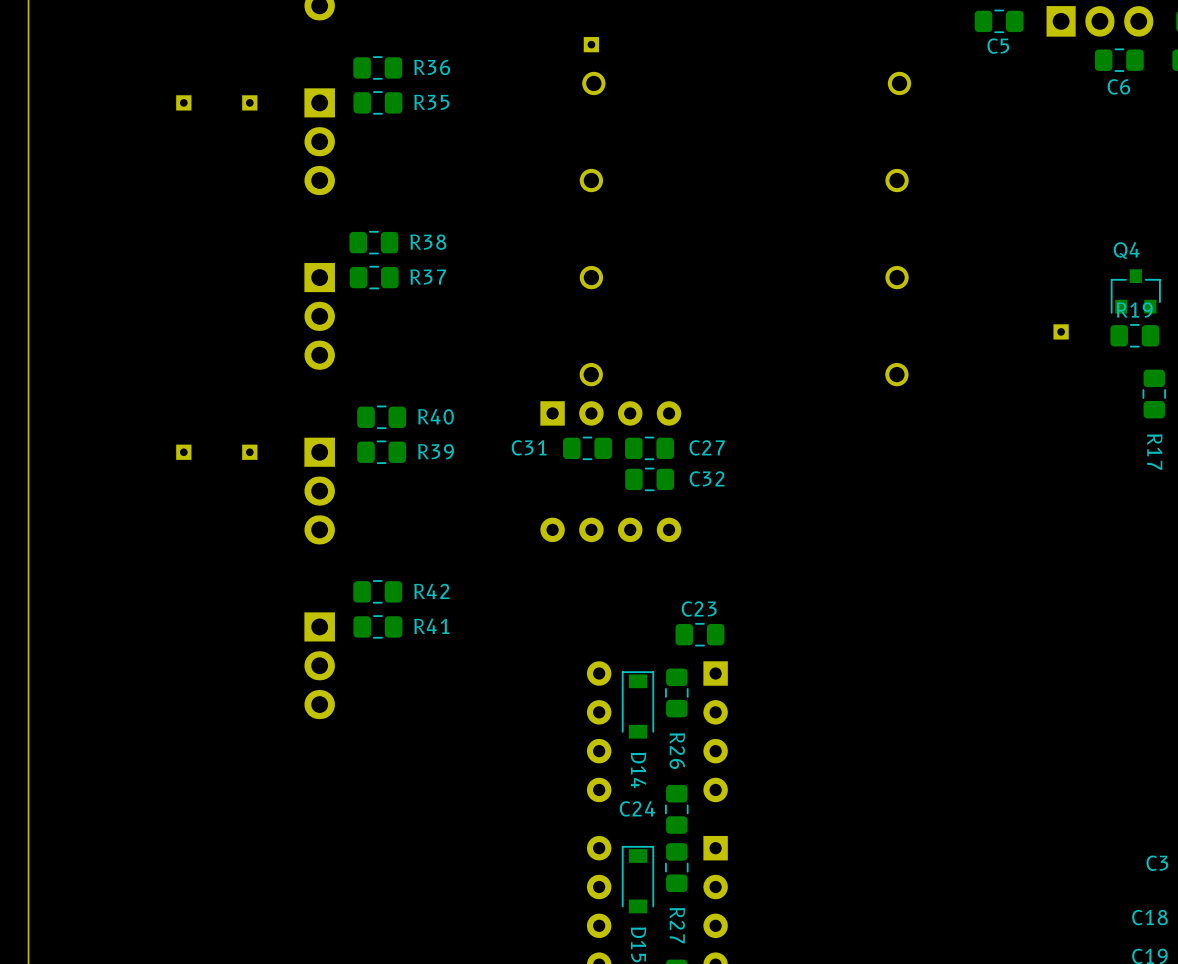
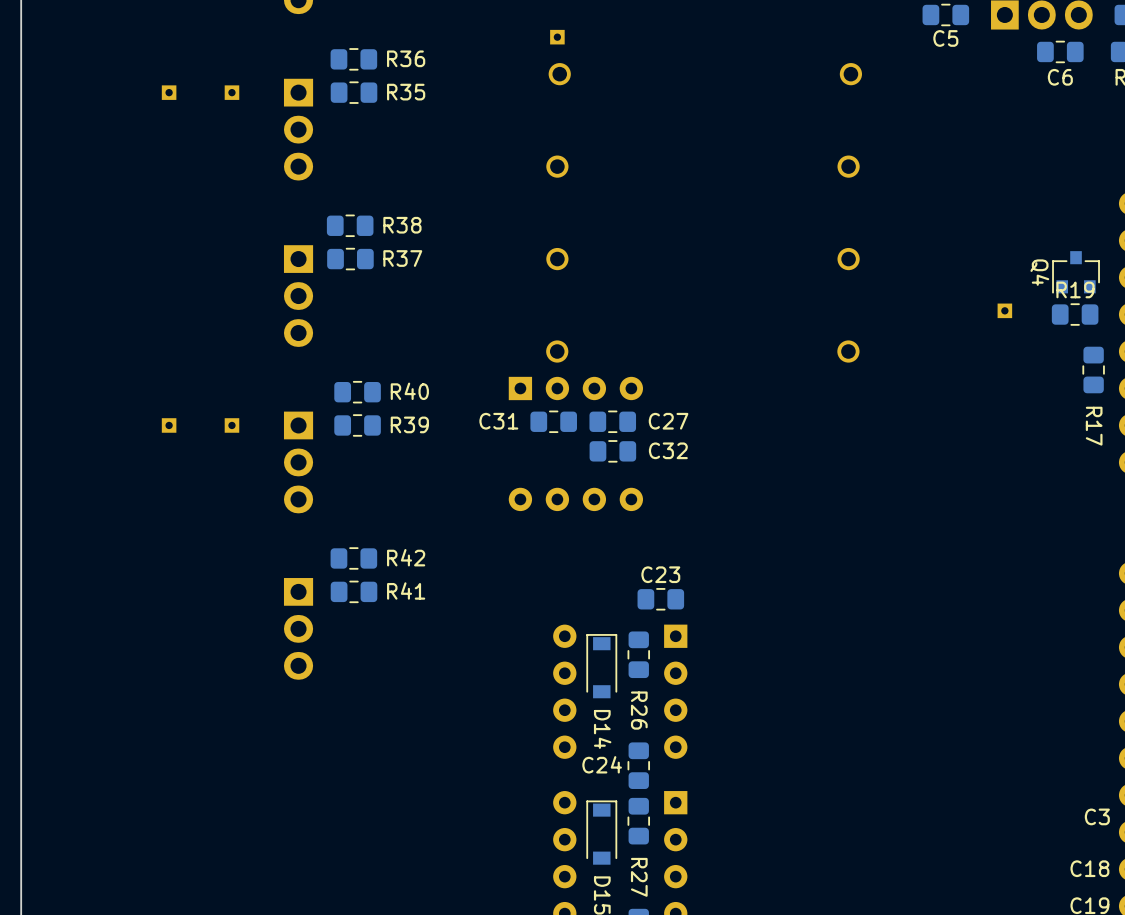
Q4 name rotation: 0° (1126, 250) -> 90° clockwise (1039, 272)
Q4 name position: Q4 (1126, 250) -> Q4 (1039, 272)

